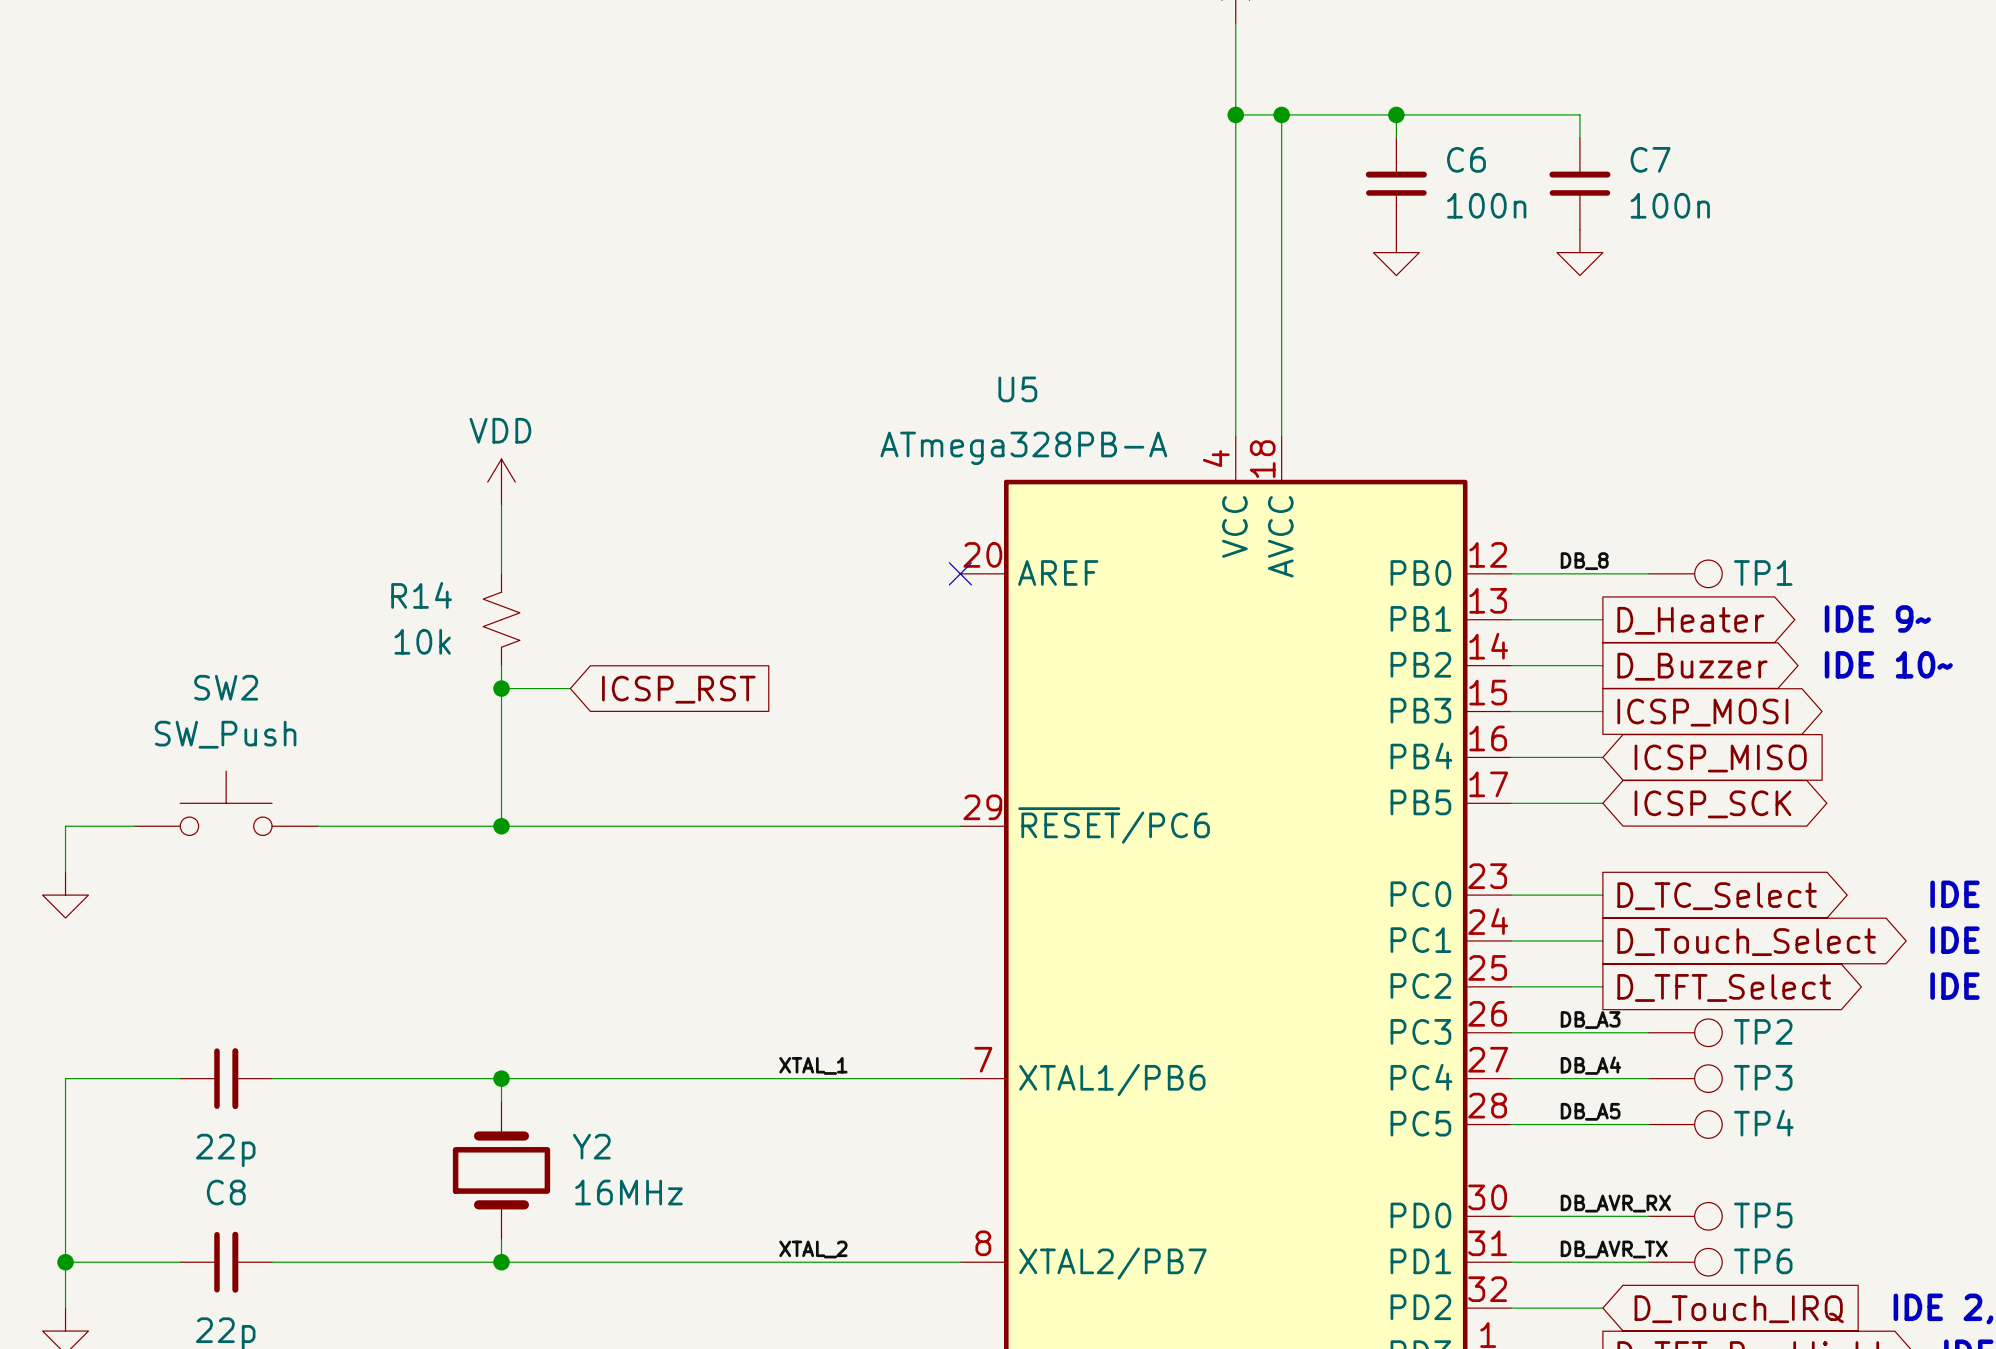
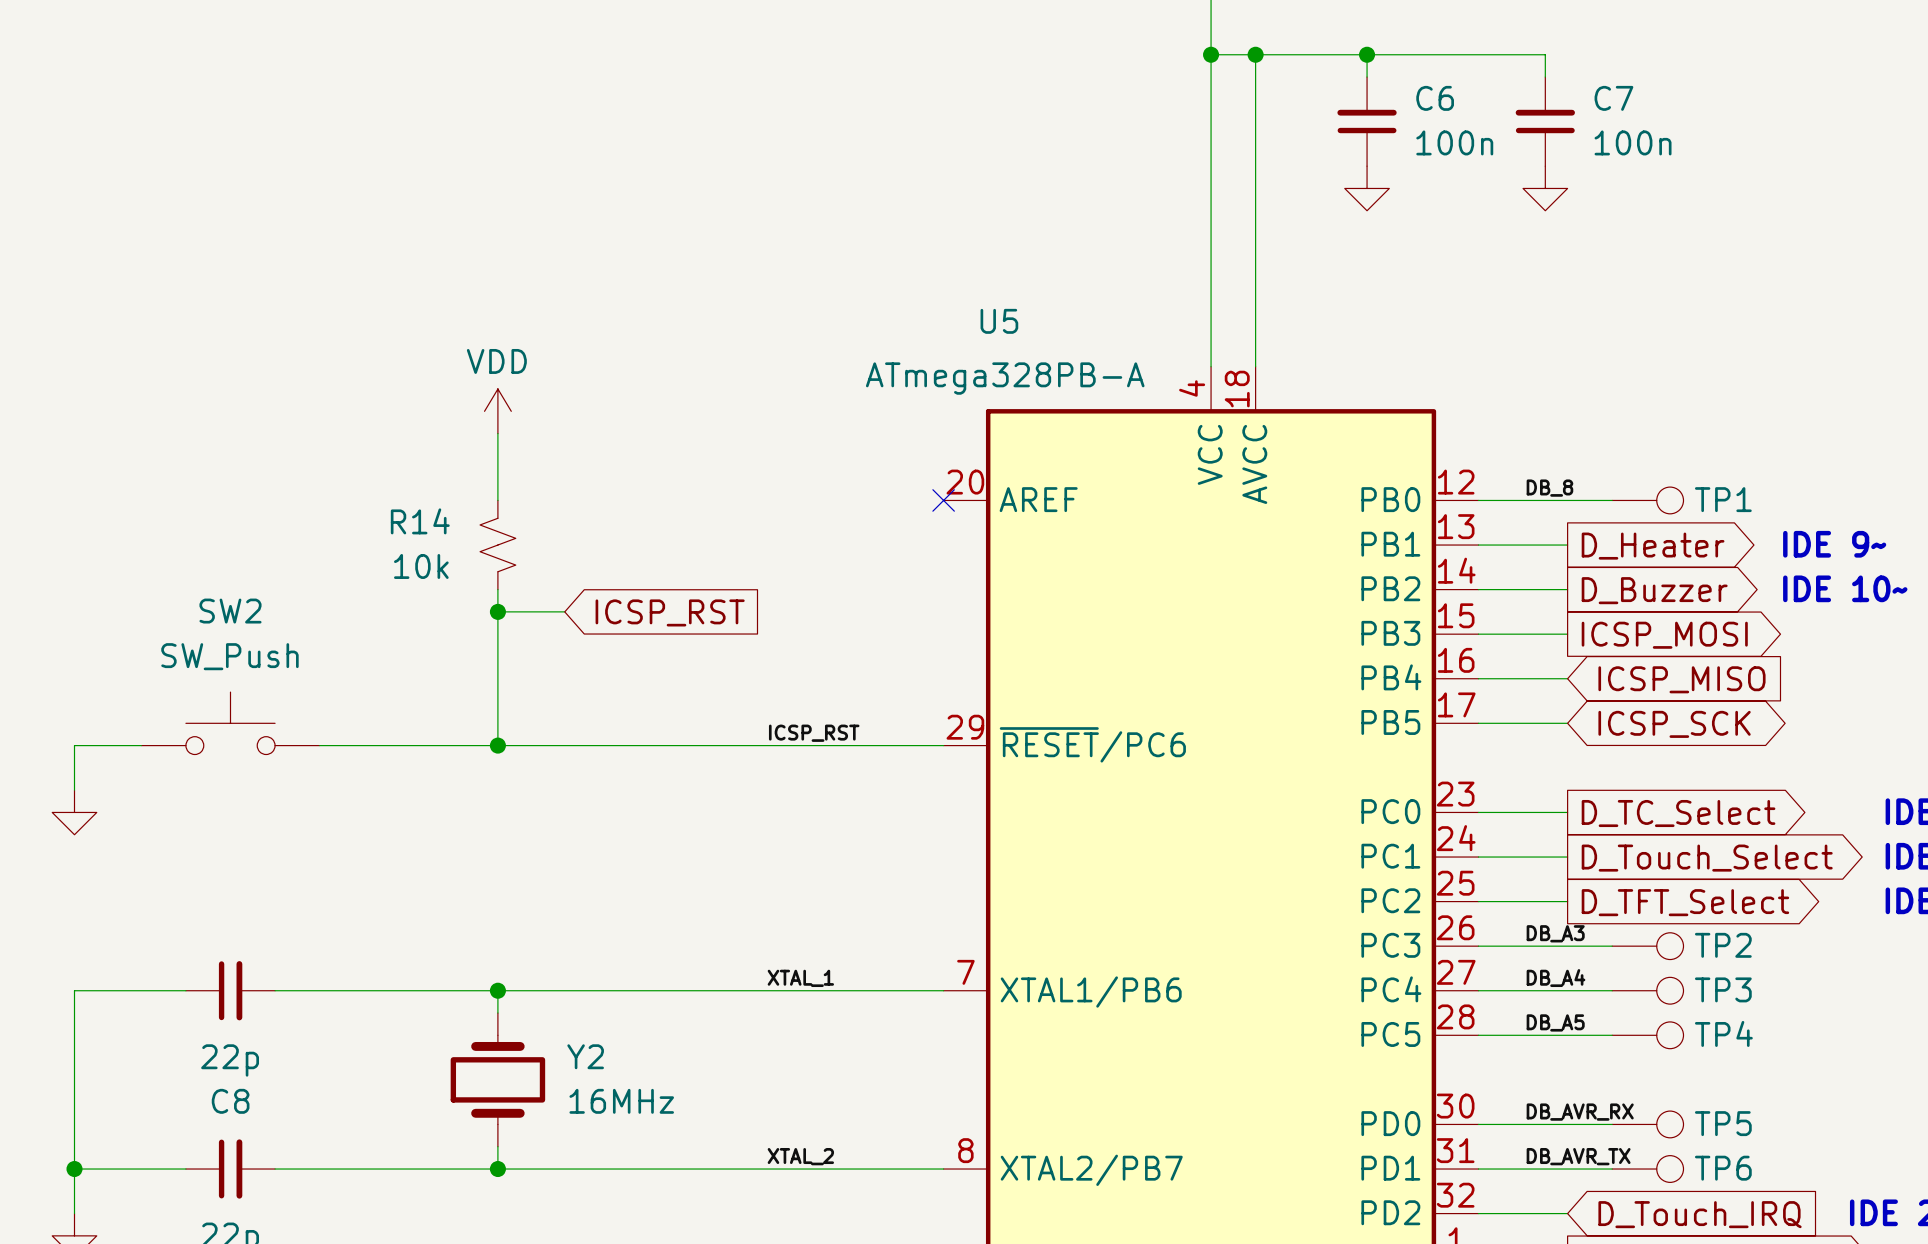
label: none -> ICSP_RST (814, 733)

